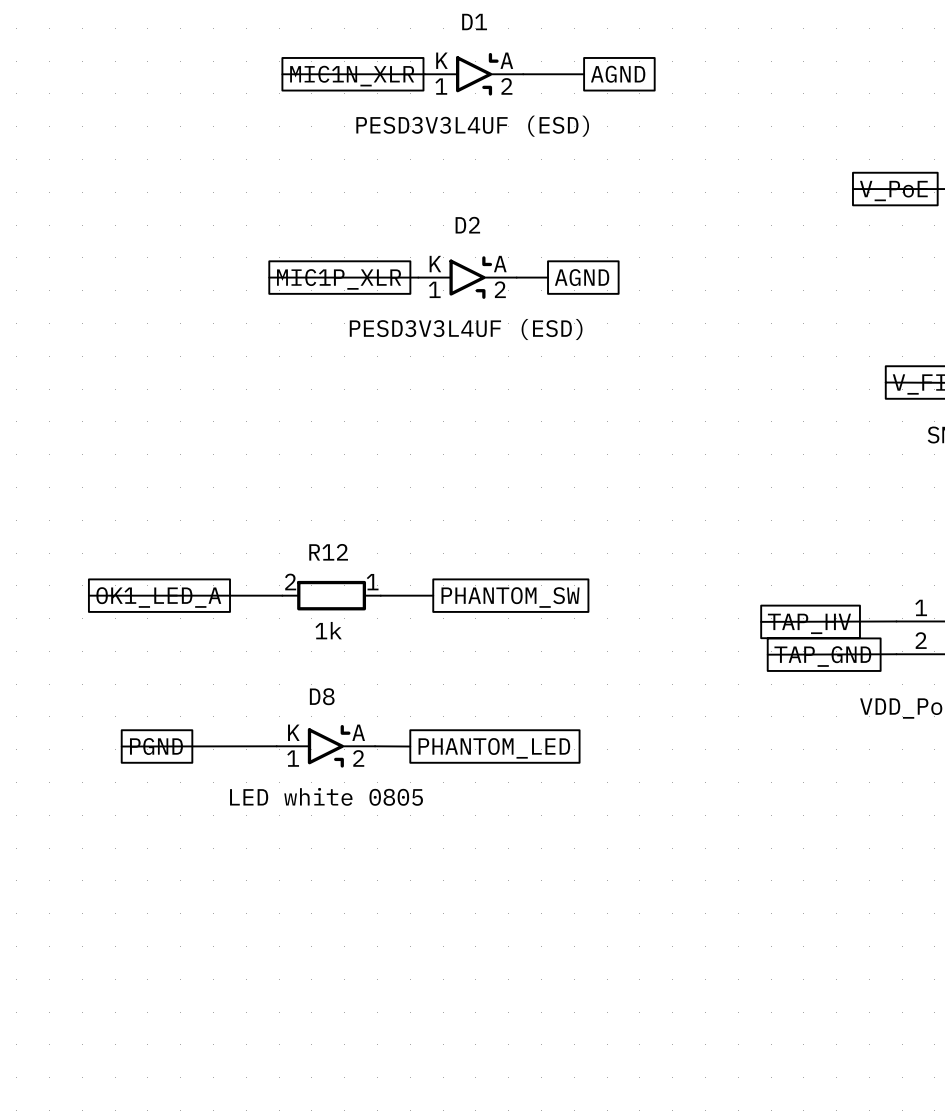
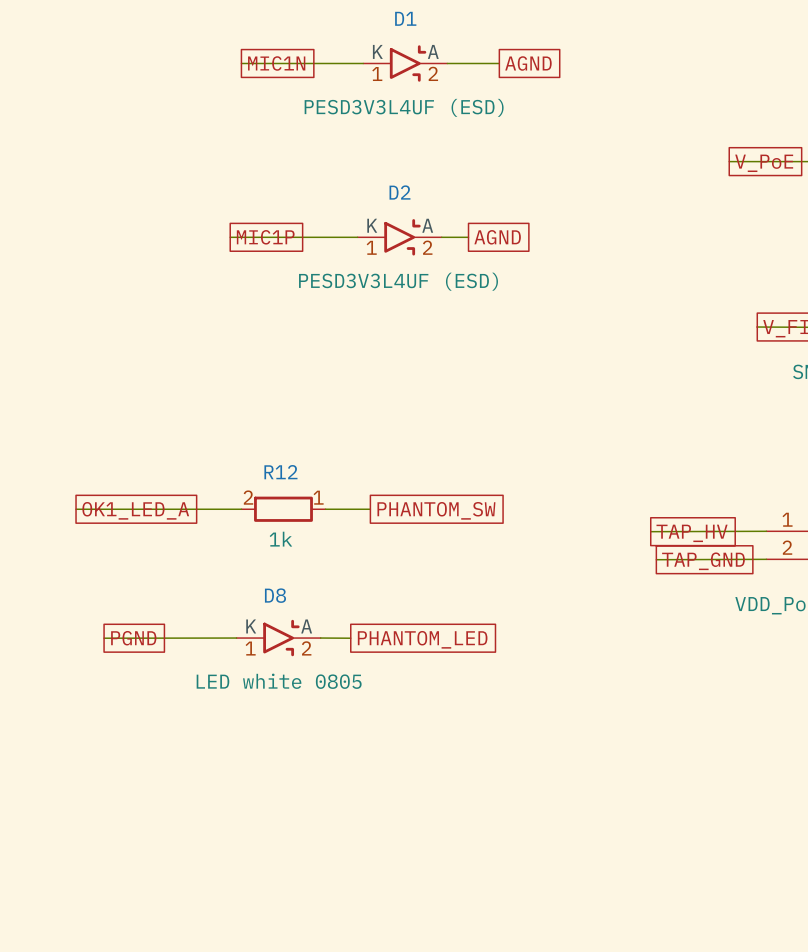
global label: MIC1N_XLR (352, 76) -> MIC1N (276, 63)
global label: MIC1P_XLR (339, 279) -> MIC1P (265, 237)

